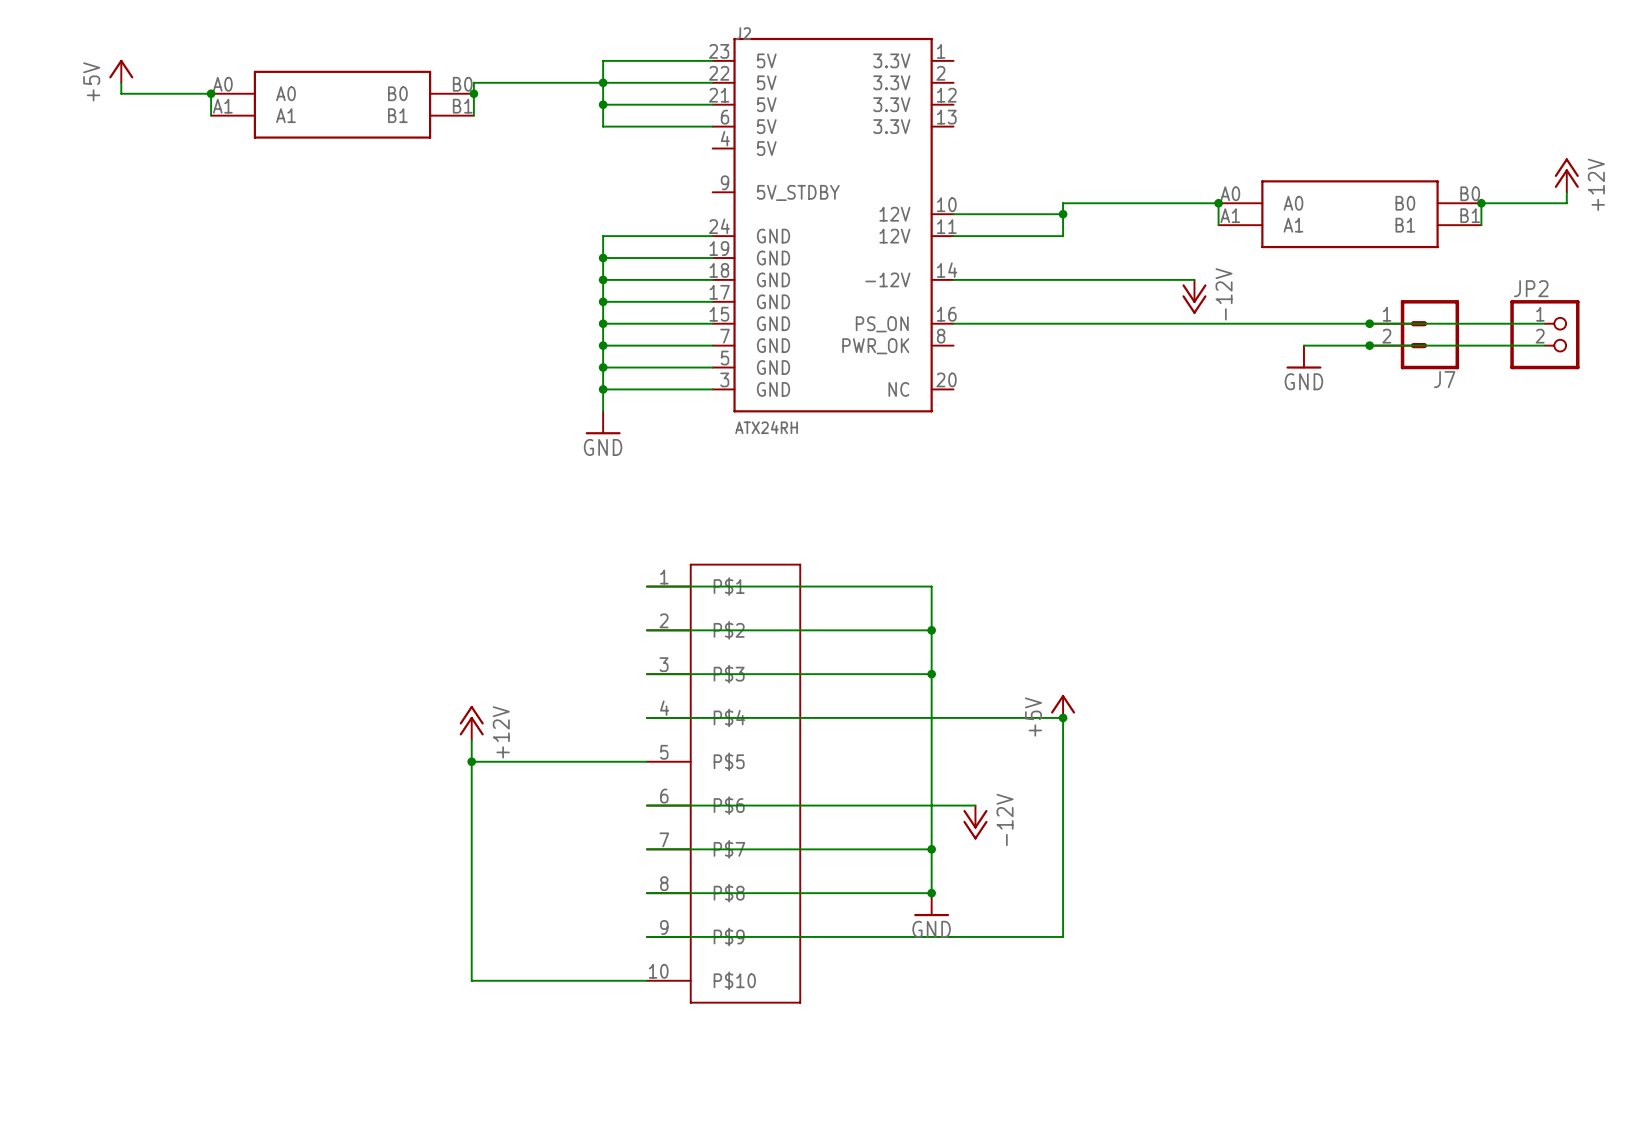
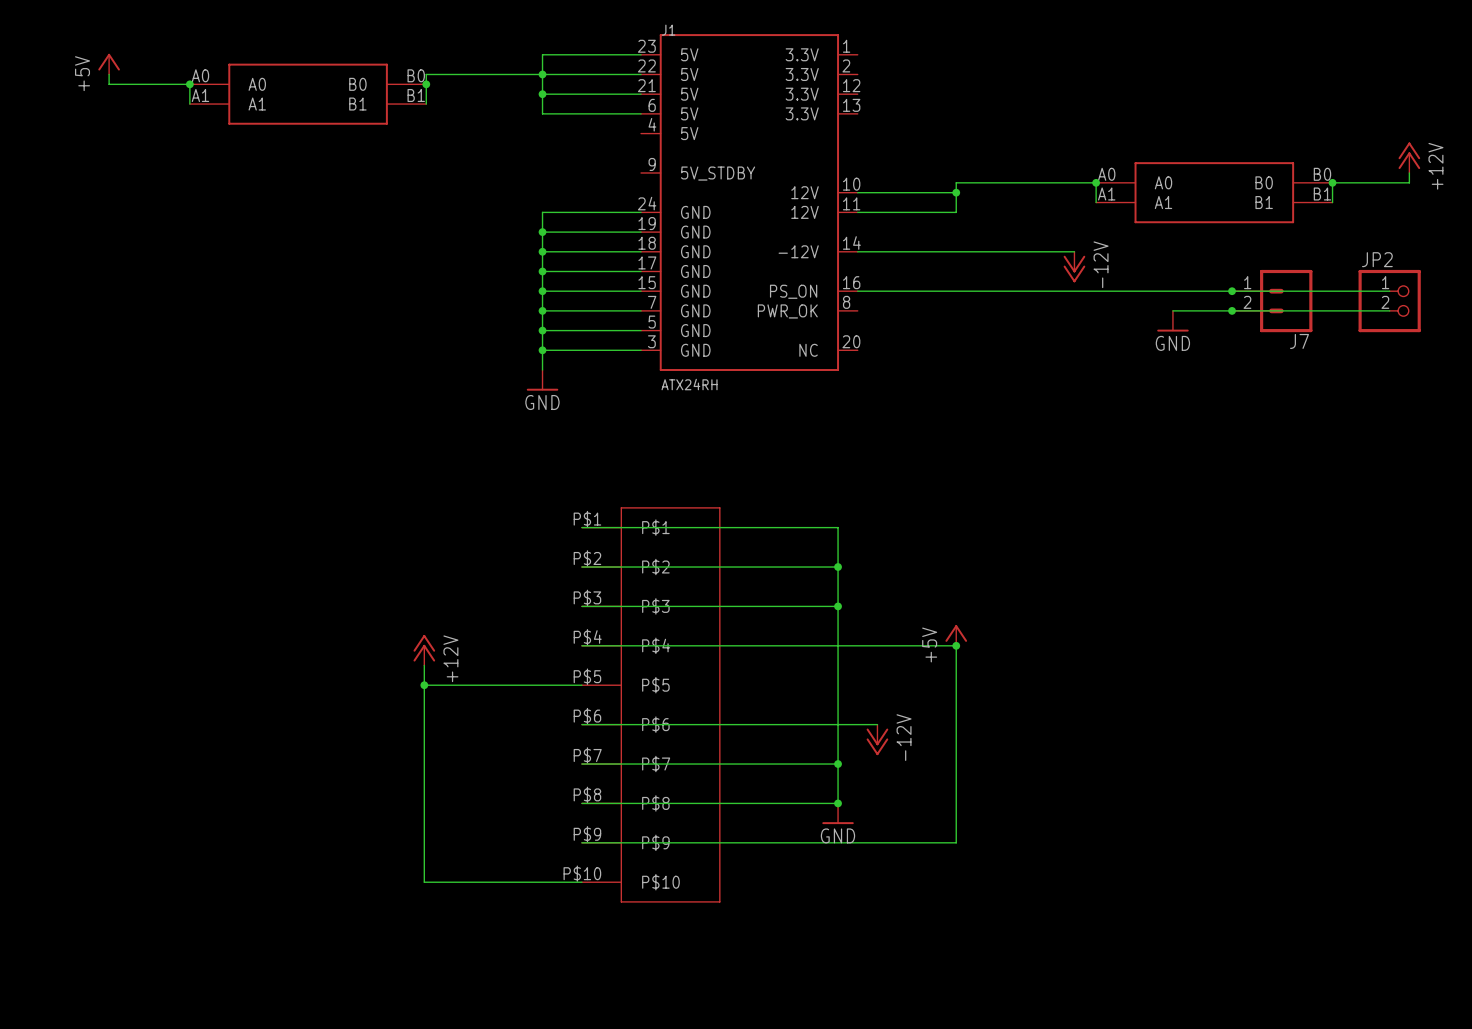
J2 name: J2 (743, 33) -> J1 (668, 30)
part symbol: [646, 563, 801, 1004] -> [581, 507, 721, 903]

